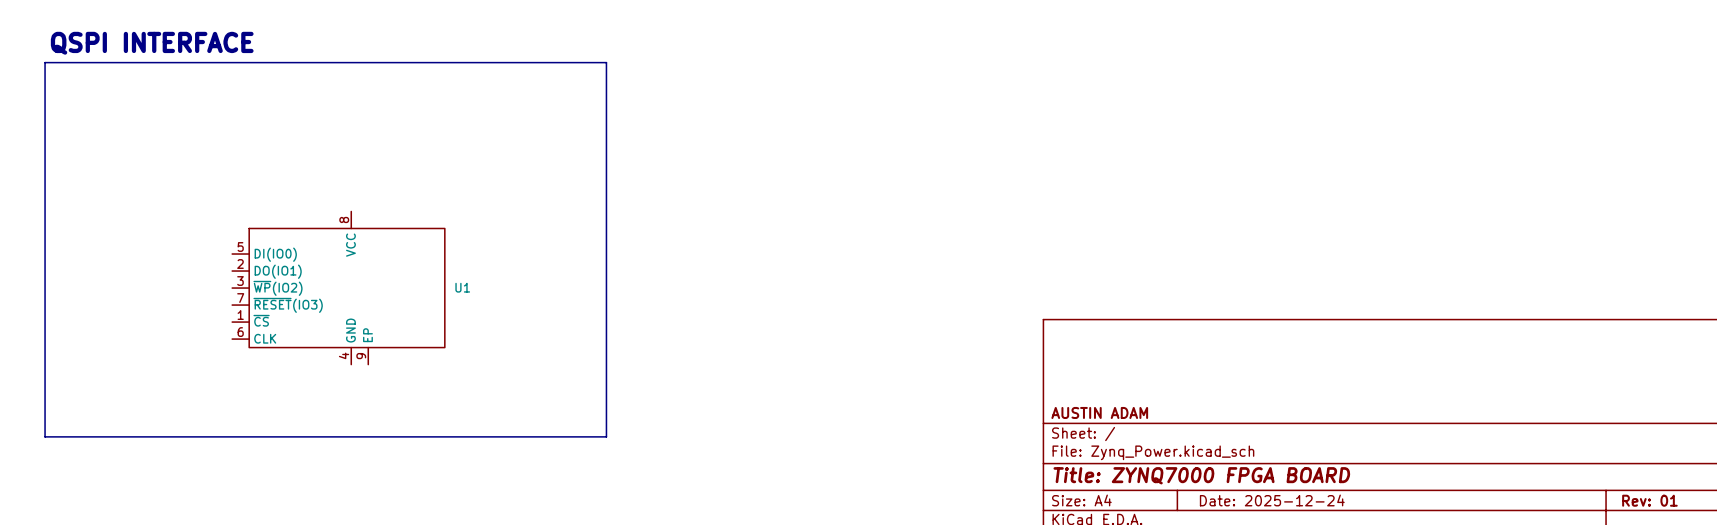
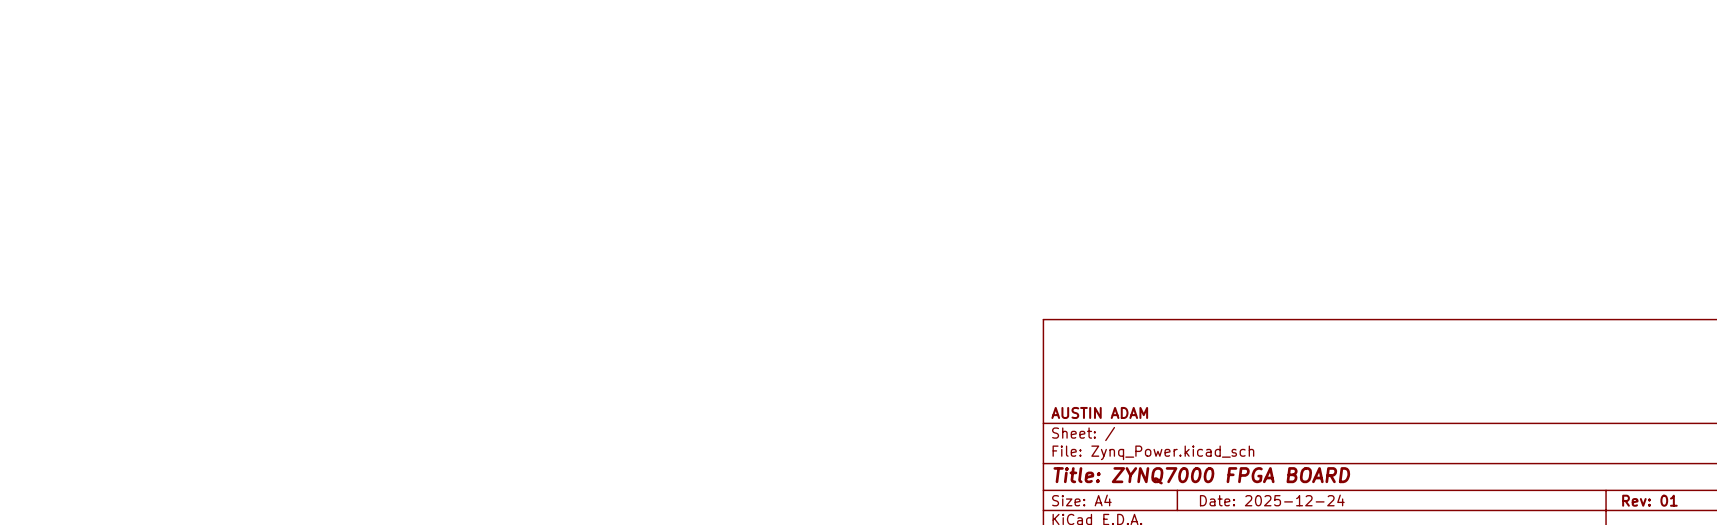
text: QSPI INTERFACE (152, 43) -> none
line: (45, 62) (606, 62) (606, 436) (45, 436) (45, 62) -> none
U1: (338, 288) -> none

